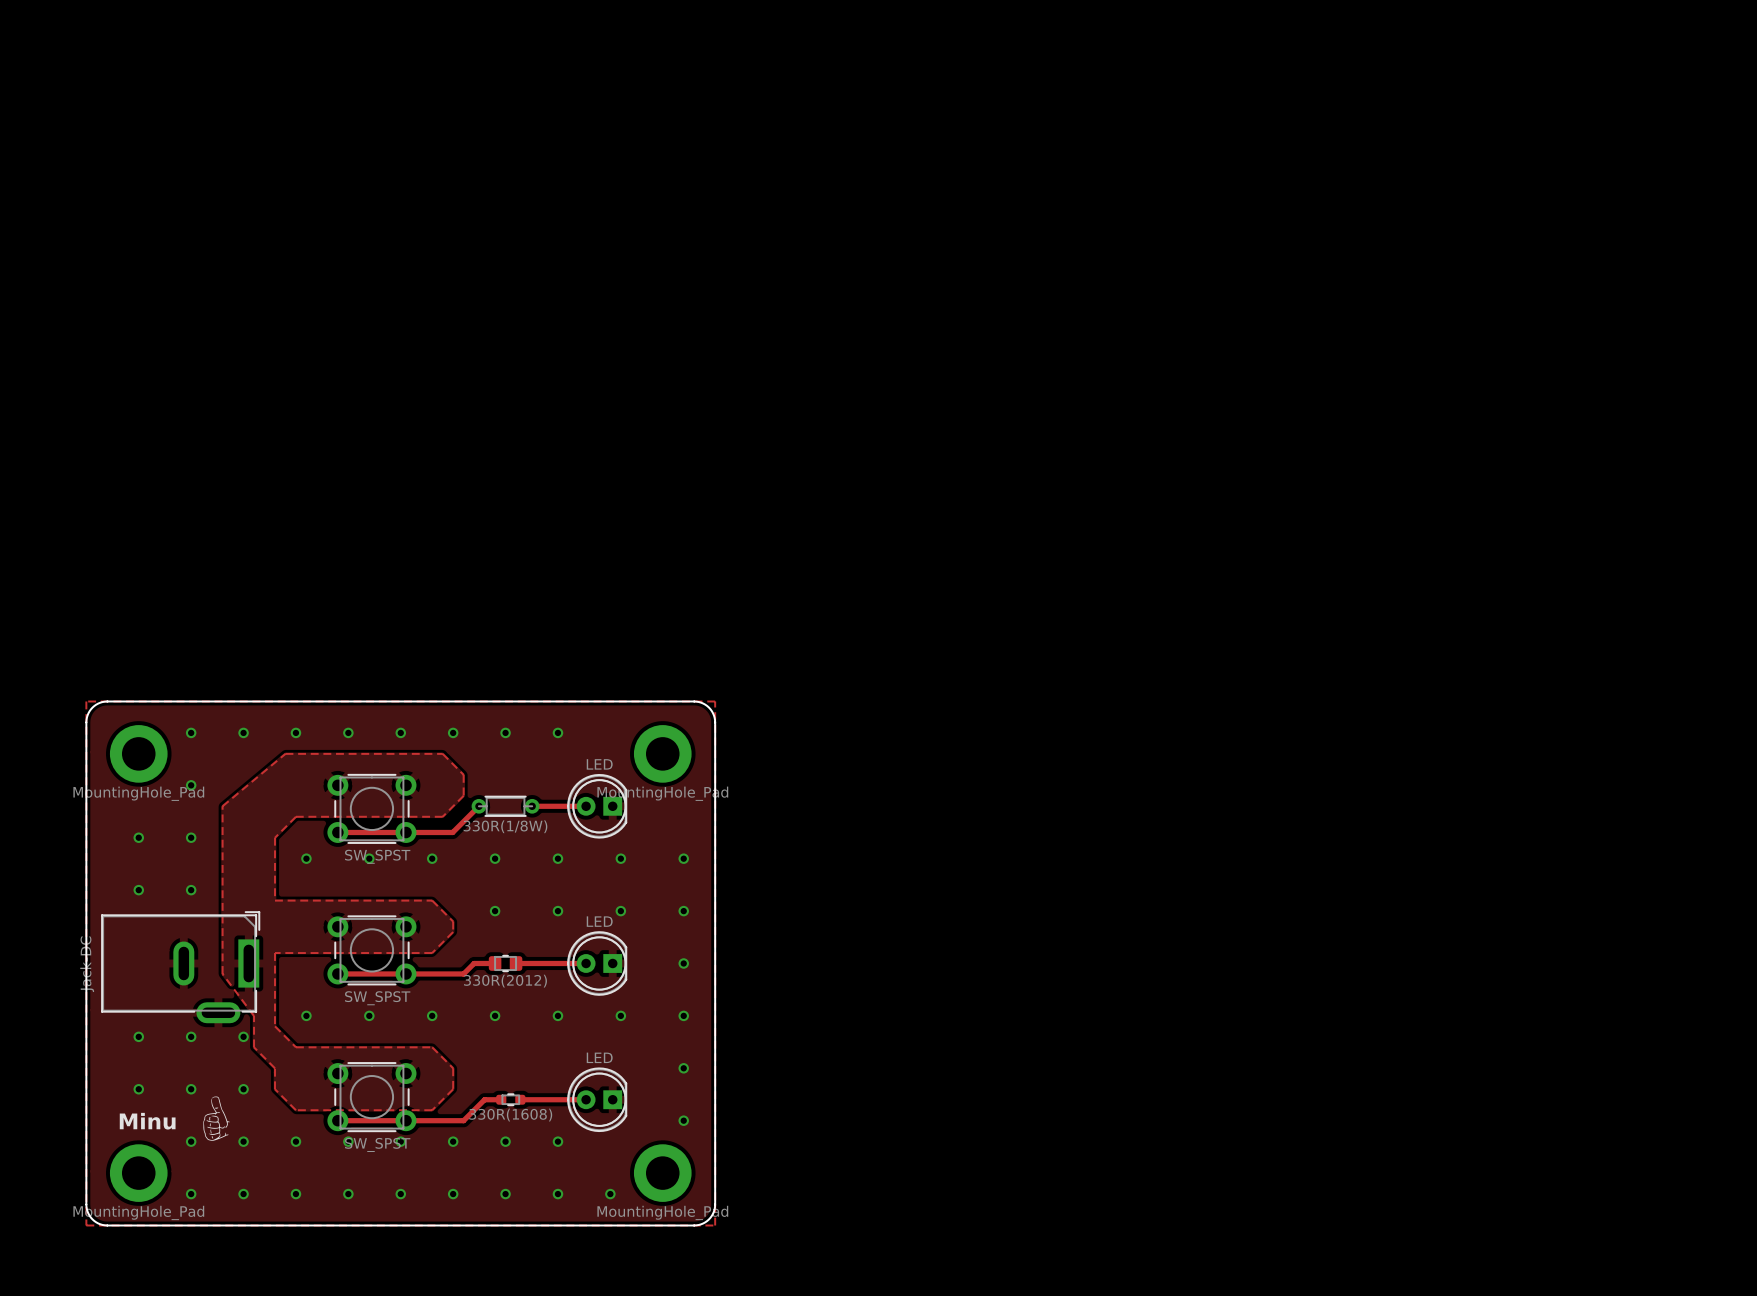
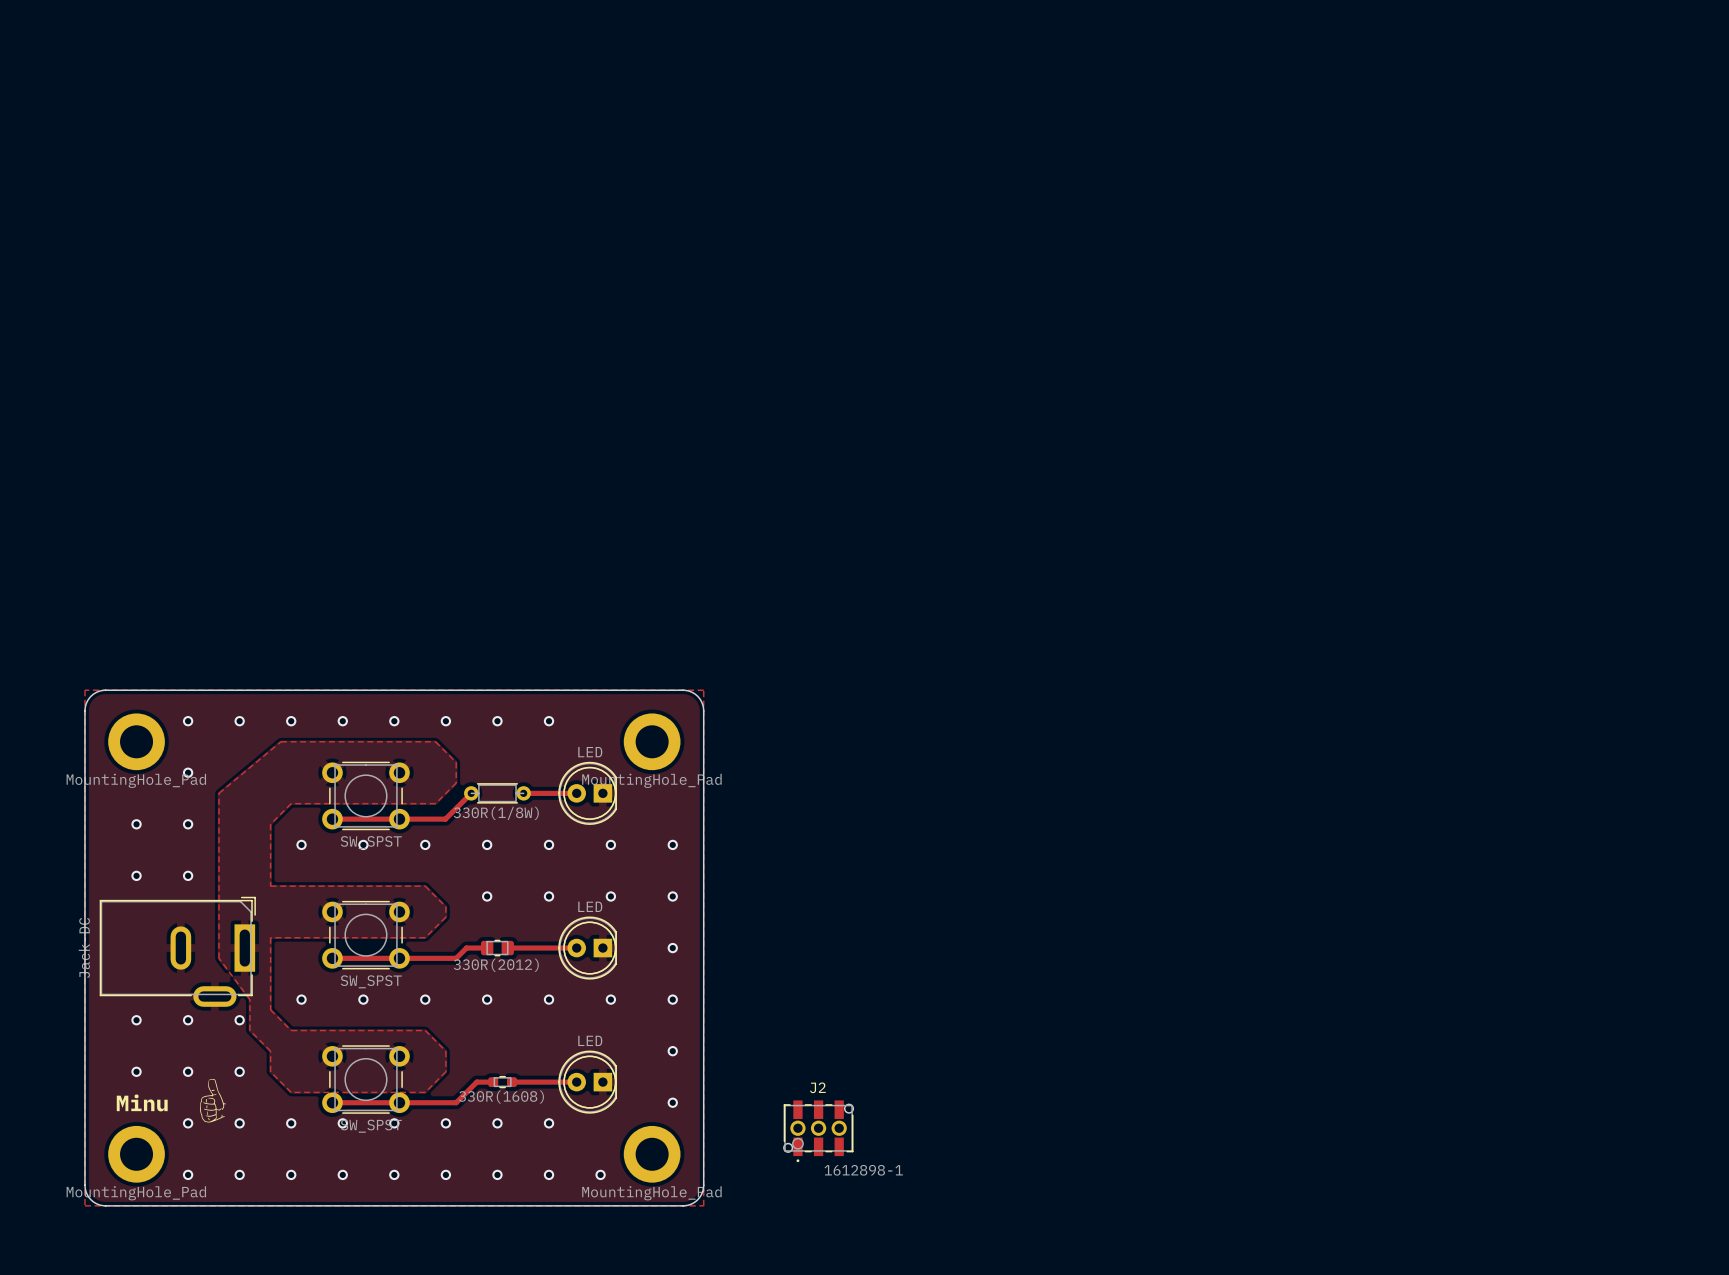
J2: none -> 1612898-1 (818, 1131)

